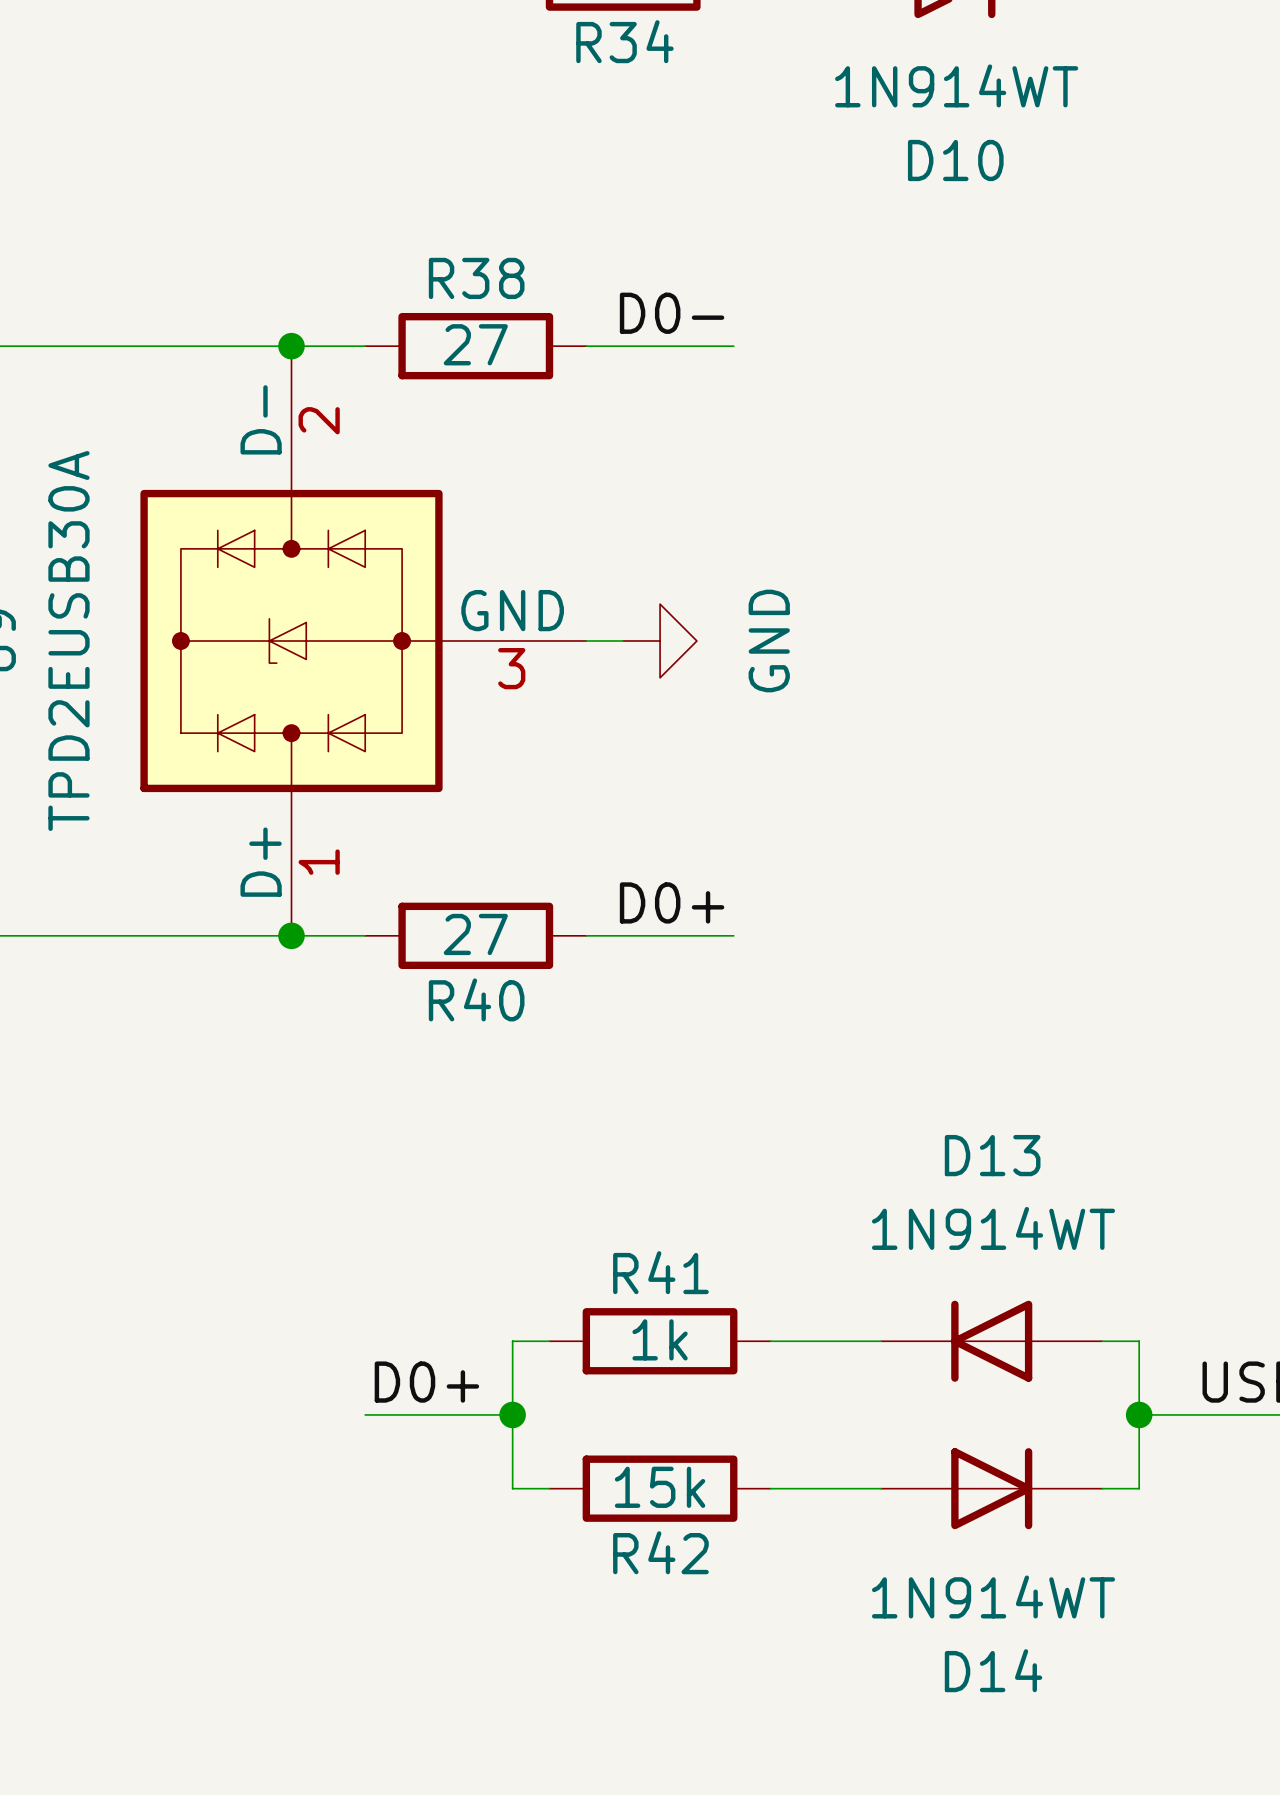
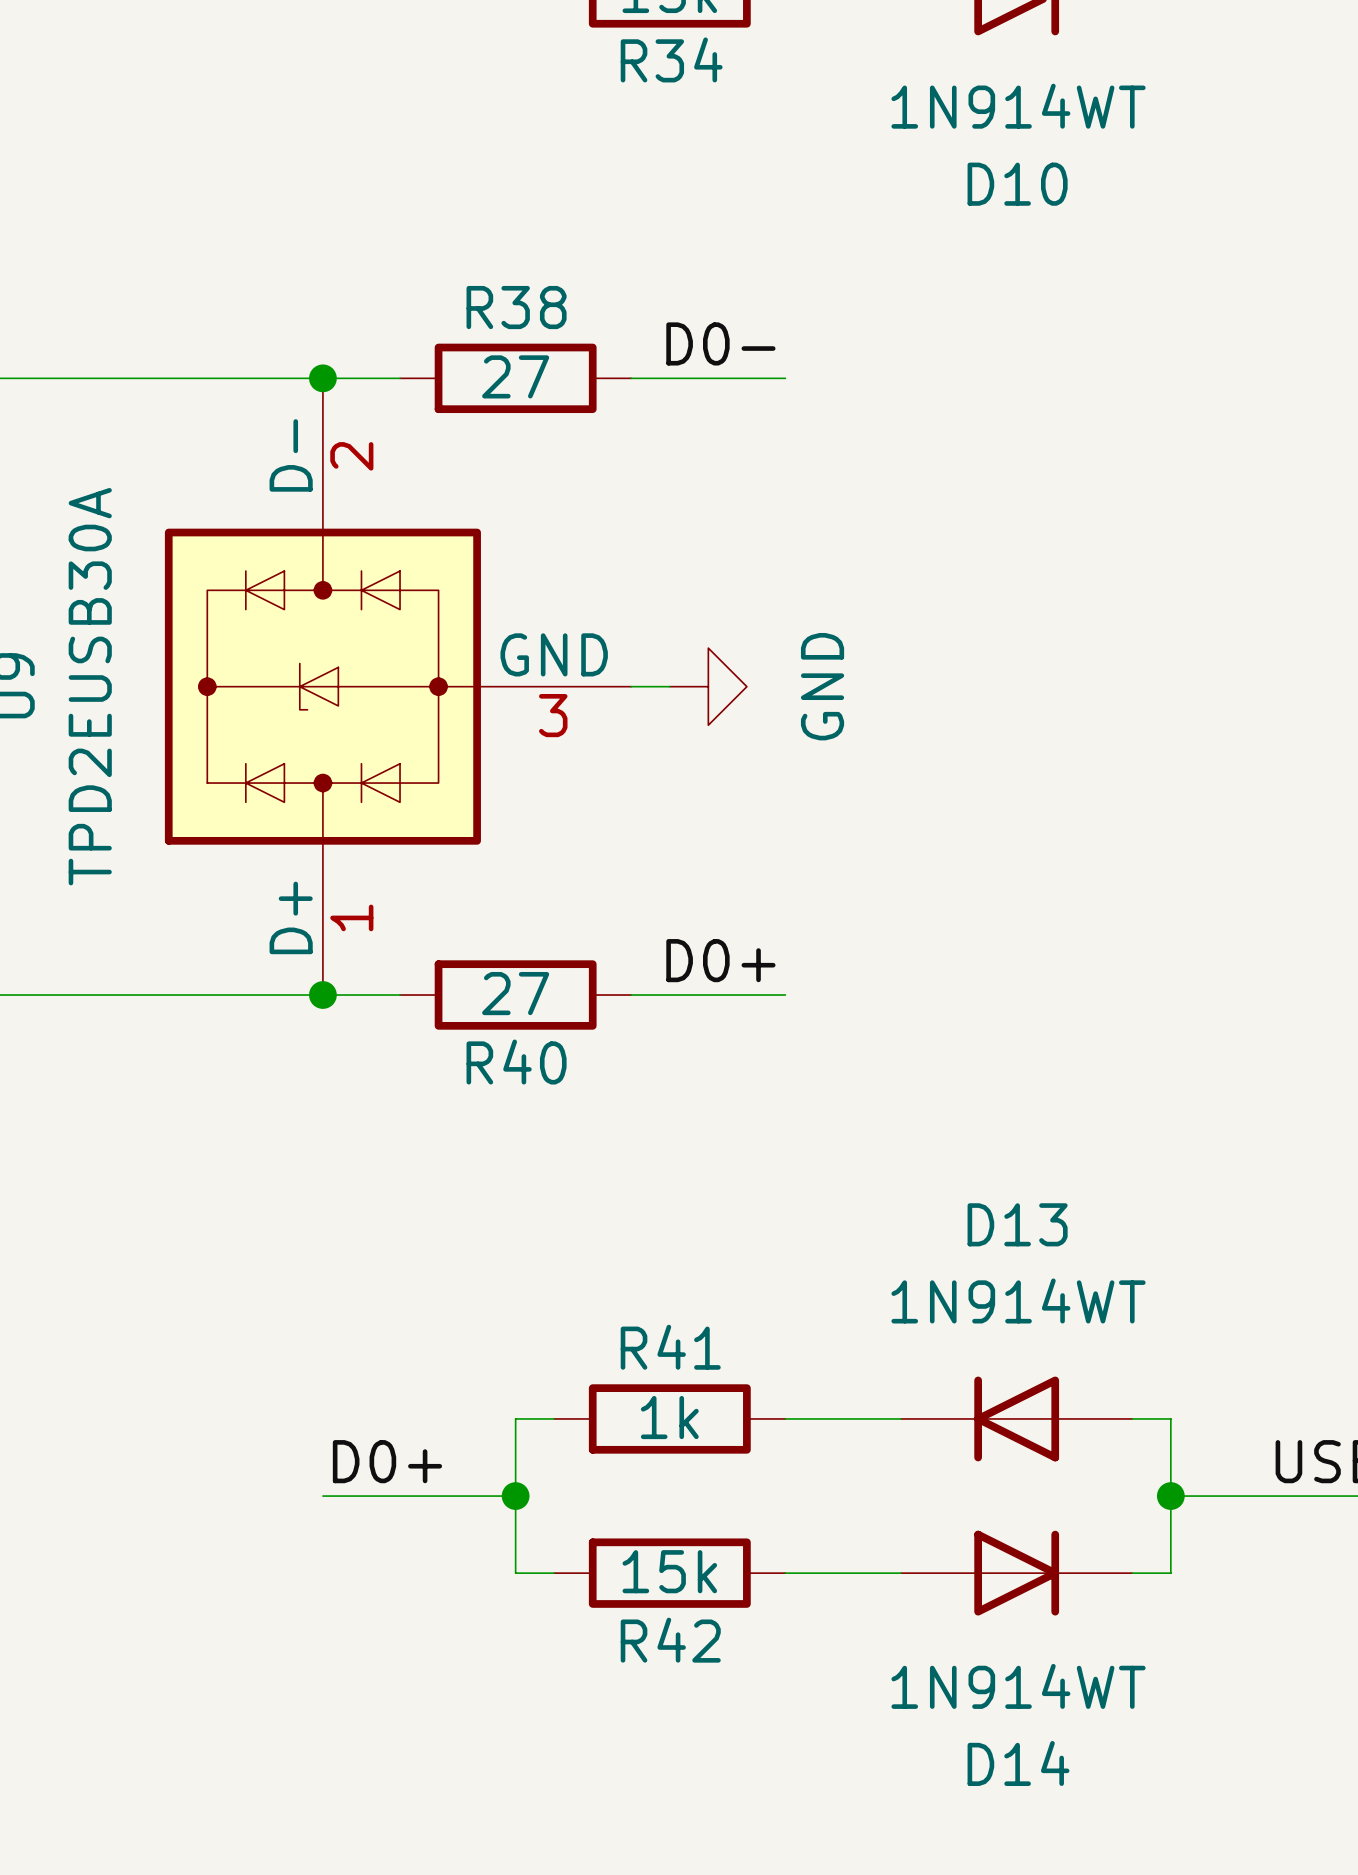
wire: (549, 1341) (512, 1341) (512, 1488) (549, 1488) -> (554, 1418) (515, 1418) (515, 1573) (554, 1573)
R41 position: (660, 1341) -> (669, 1418)
D13 position: (991, 1341) -> (1016, 1418)
wire: (1102, 1341) (1139, 1341) (1139, 1488) (1102, 1488) -> (1132, 1418) (1170, 1418) (1170, 1573) (1132, 1573)
label position: D0+ (426, 1382) -> D0+ (387, 1461)
wire: none -> (322, 1496) (400, 1496)
wire: (475, 1414) (512, 1414) -> (1170, 1496) (1209, 1496)
junction position: (512, 1414) -> (515, 1496)
junction position: (1139, 1414) -> (1170, 1496)
R42 position: (660, 1488) -> (669, 1573)
D14 position: (991, 1488) -> (1016, 1573)

